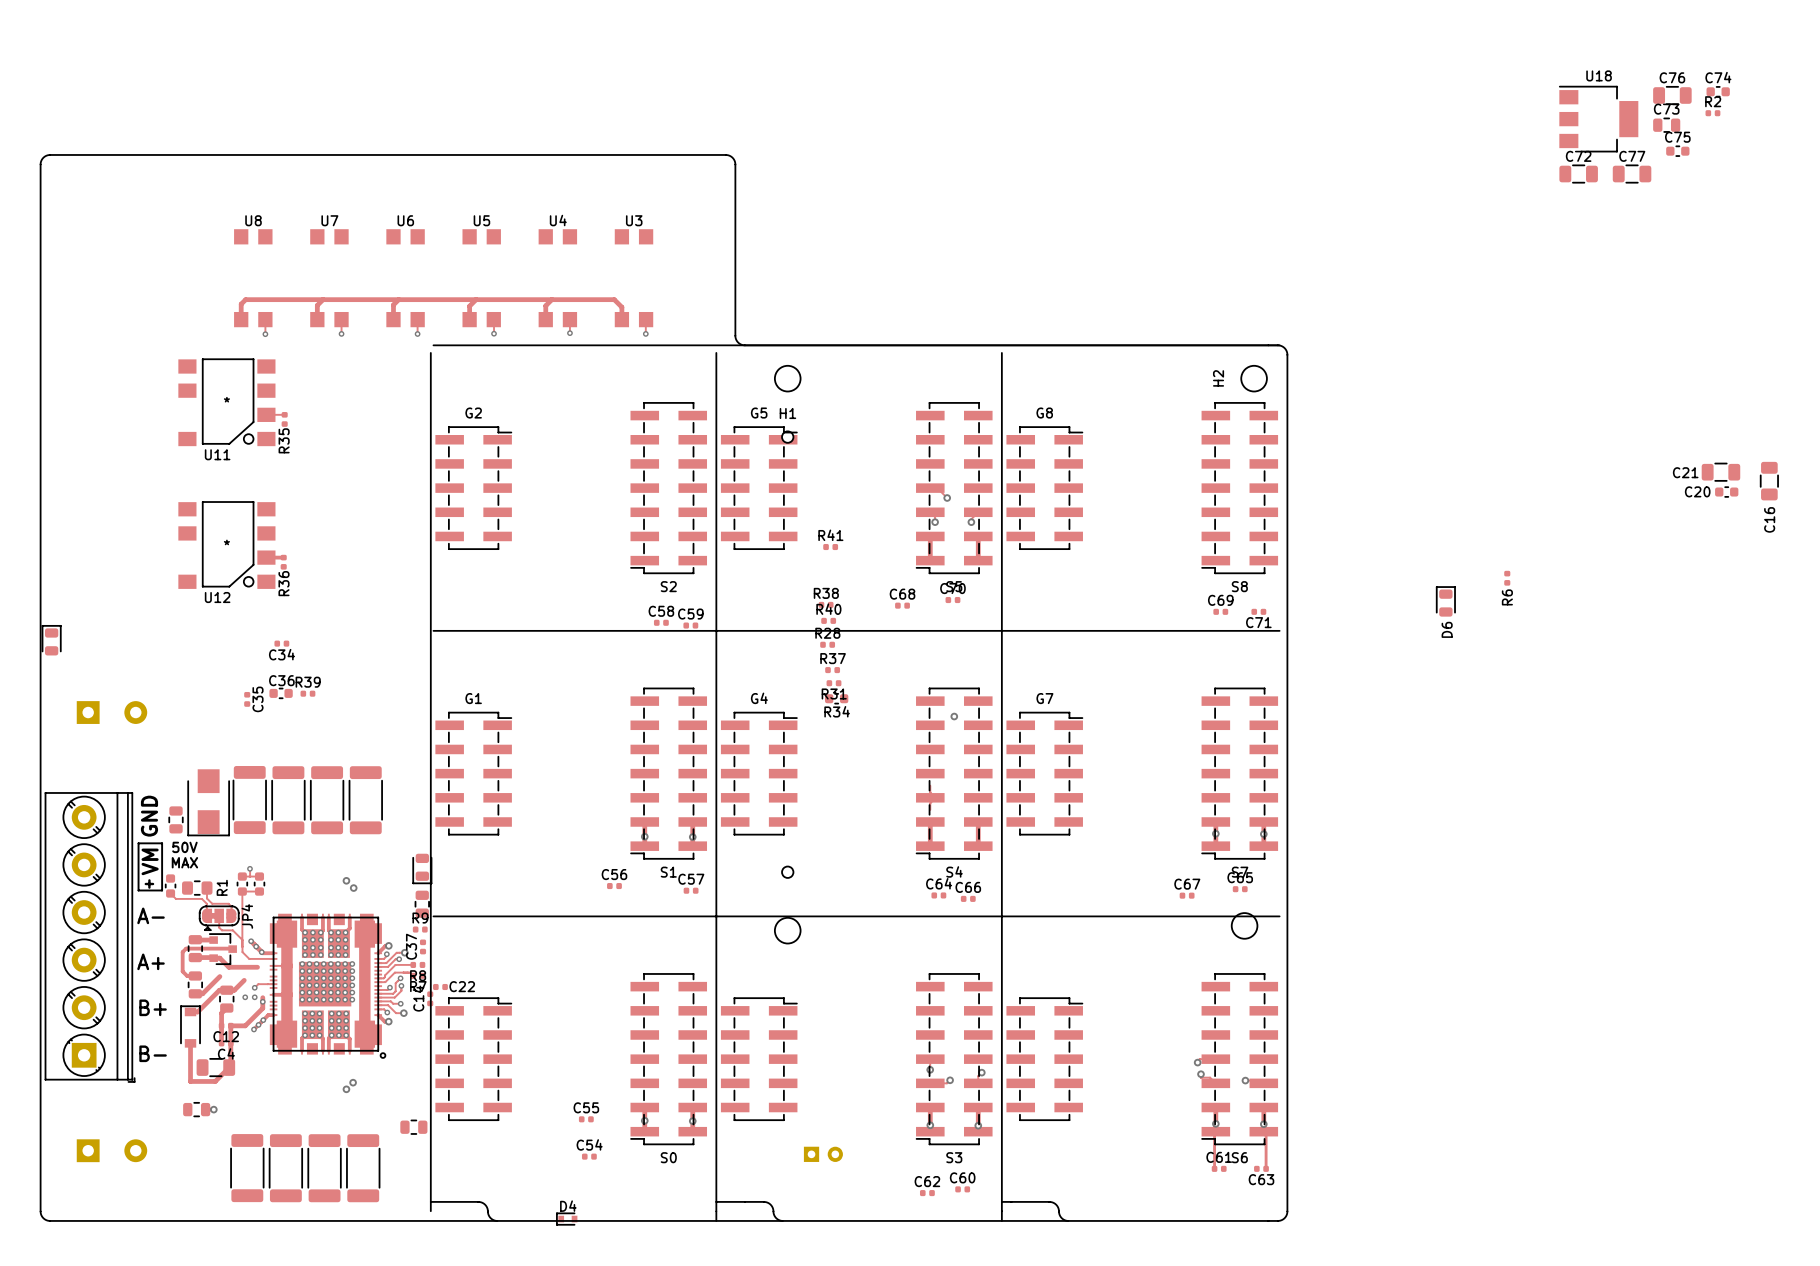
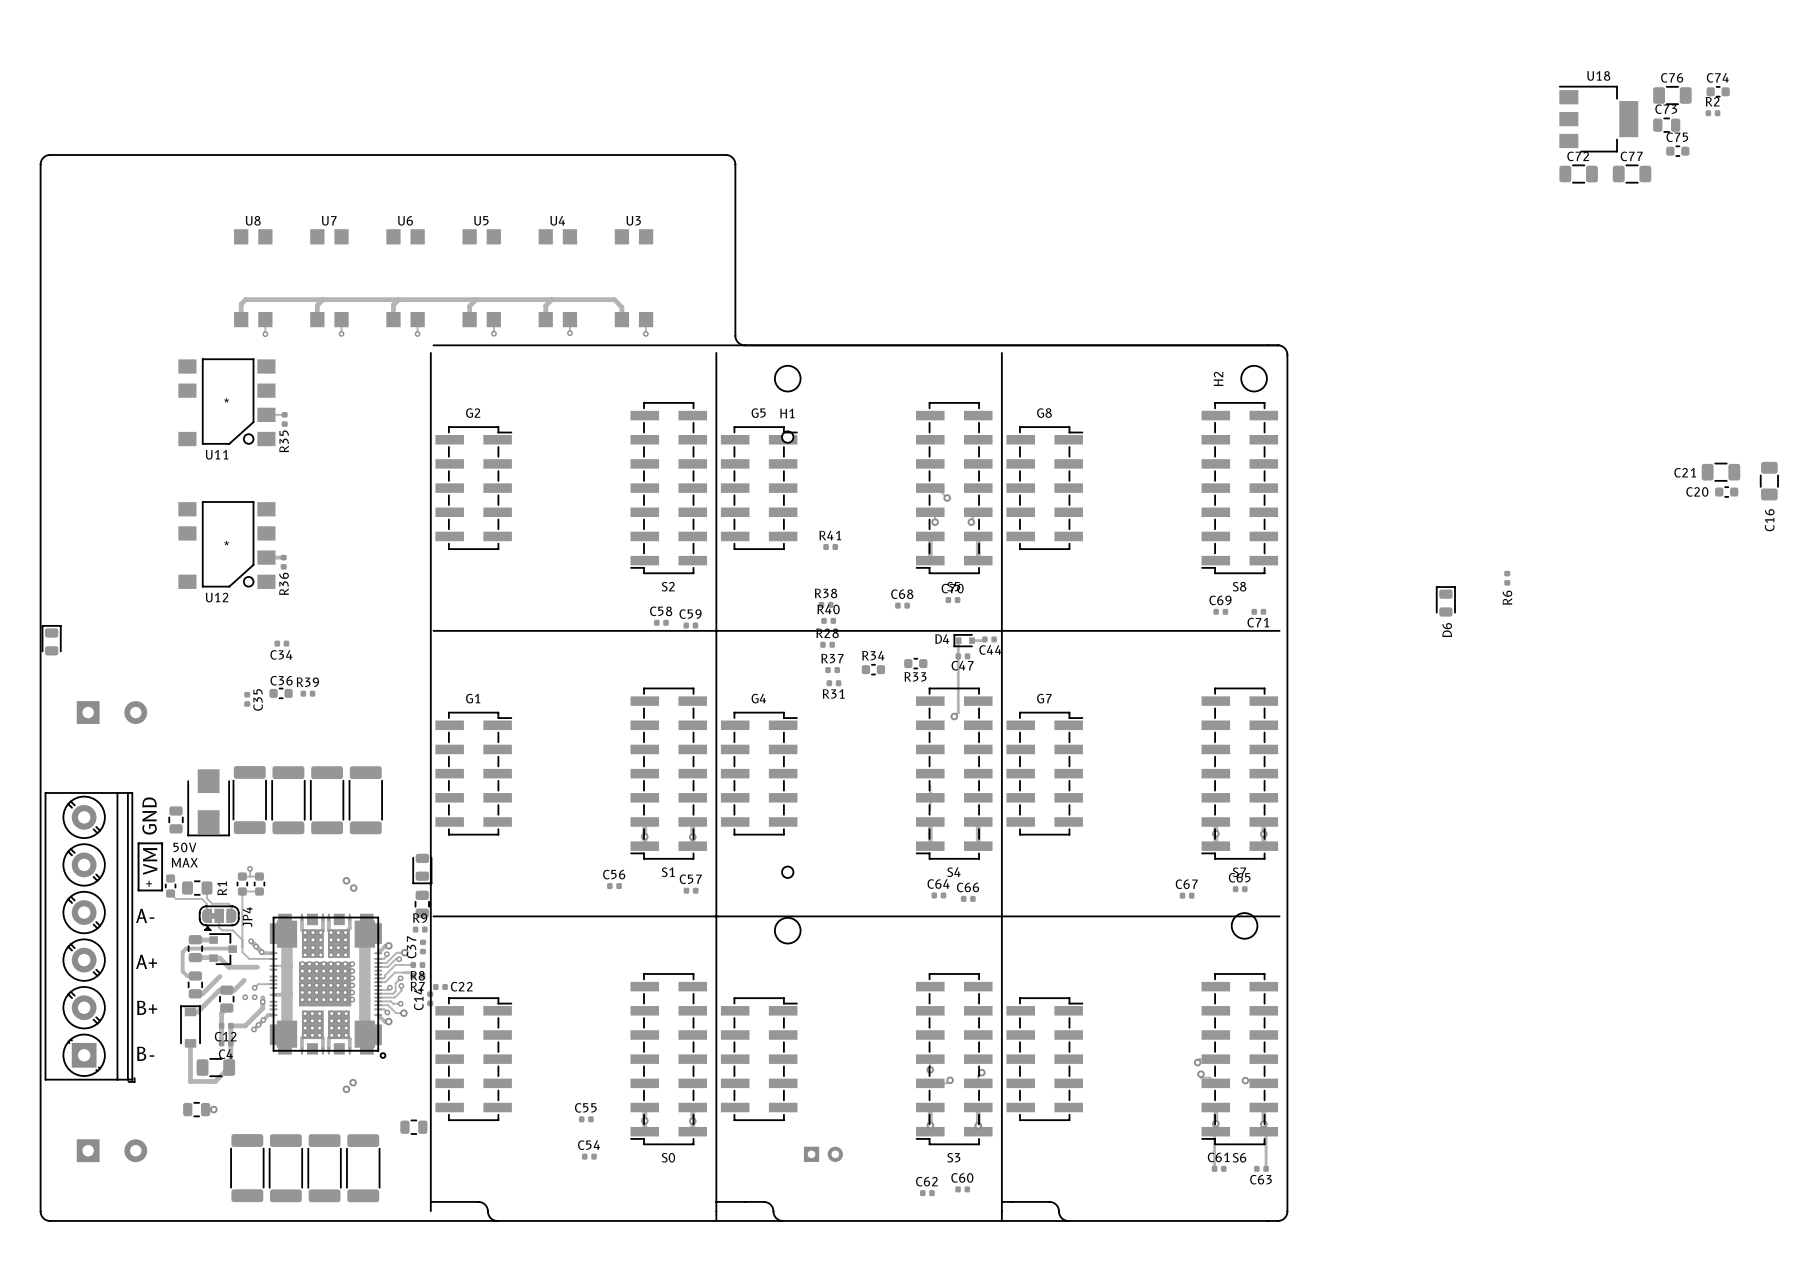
track: none -> (984, 639) (971, 640)
C44: none -> (989, 639)
track: none -> (958, 640) (958, 712) (954, 716)
C47: none -> (962, 656)
R33: none -> (915, 663)
R34 position: (836, 698) -> (873, 669)
R34 name position: R34 (837, 711) -> R34 (873, 655)
D4 name position: D4 (568, 1206) -> D4 (942, 639)
D4 position: (566, 1219) -> (964, 640)

